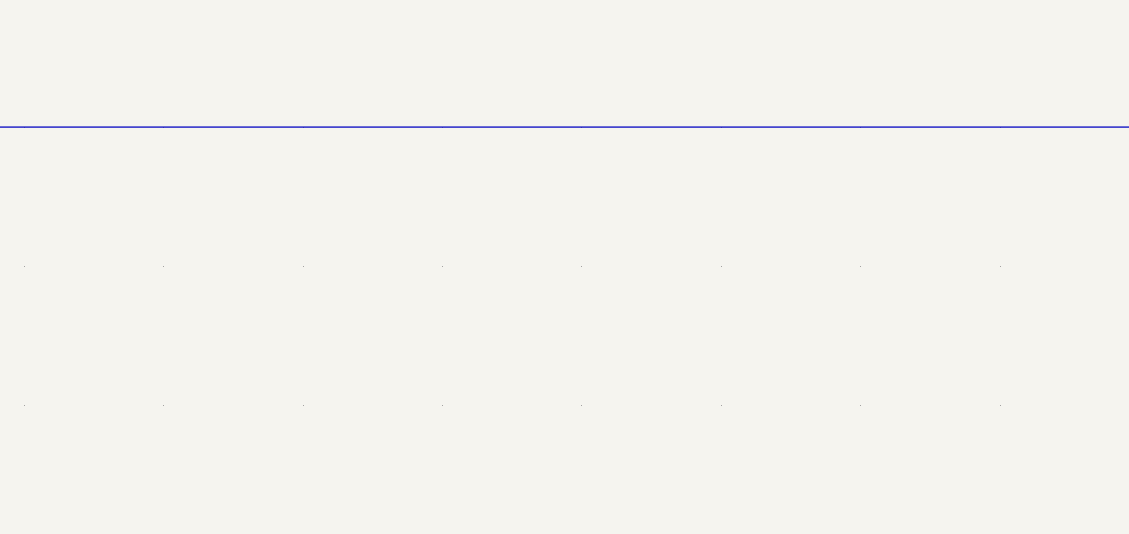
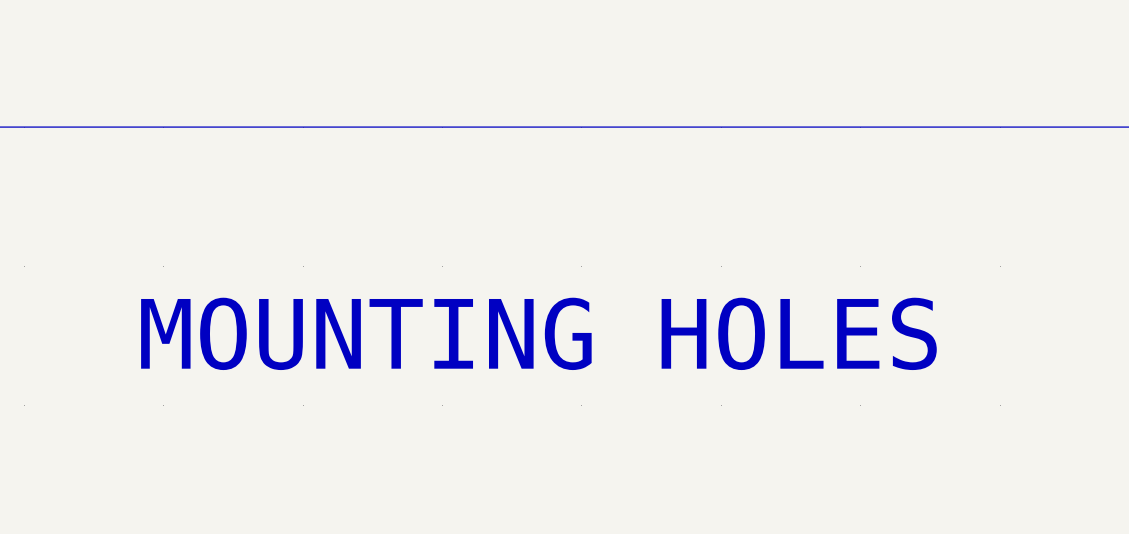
text: none -> MOUNTING HOLES (538, 333)

